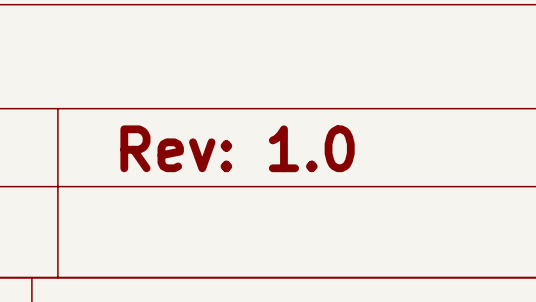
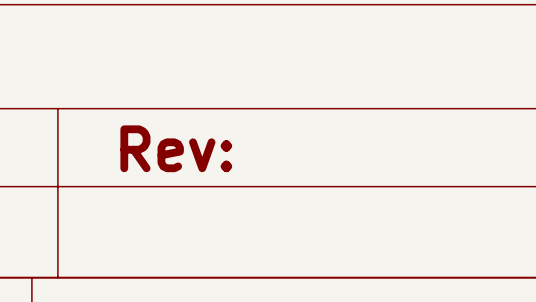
title block: Rev: 1.0 (237, 148) -> Rev: (176, 148)

